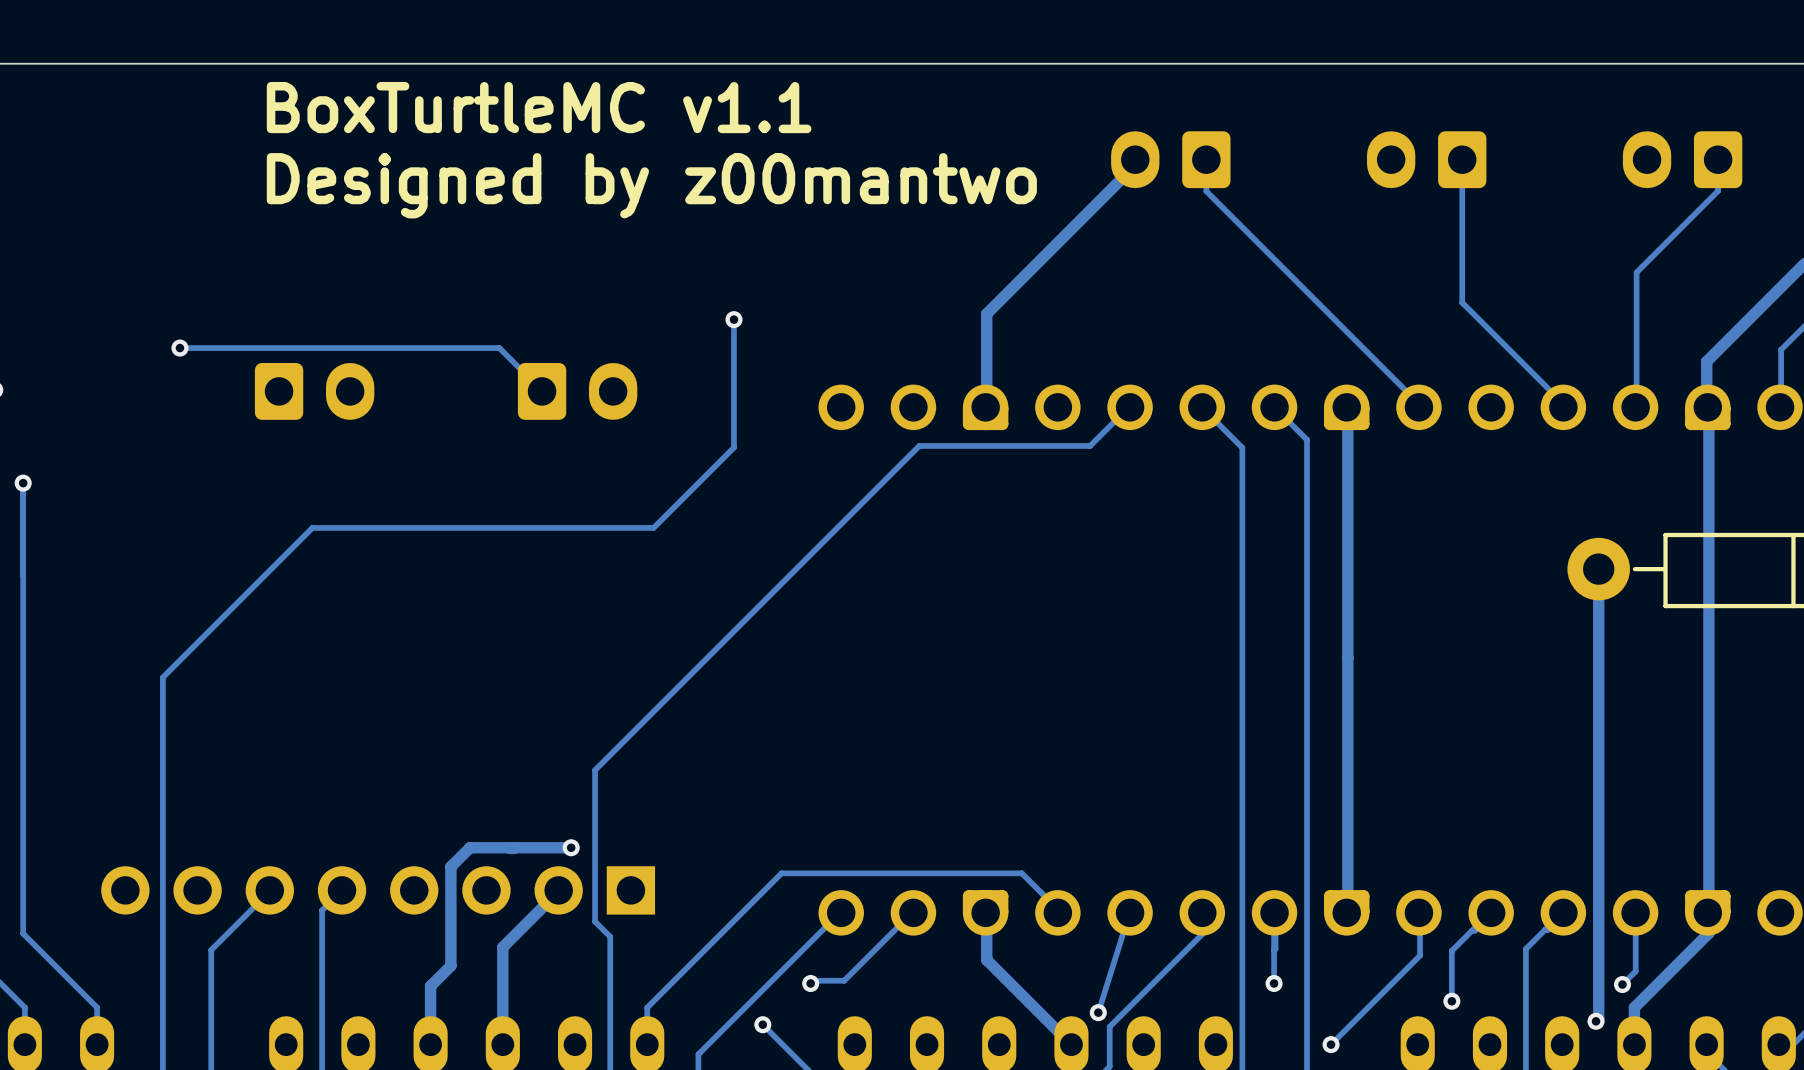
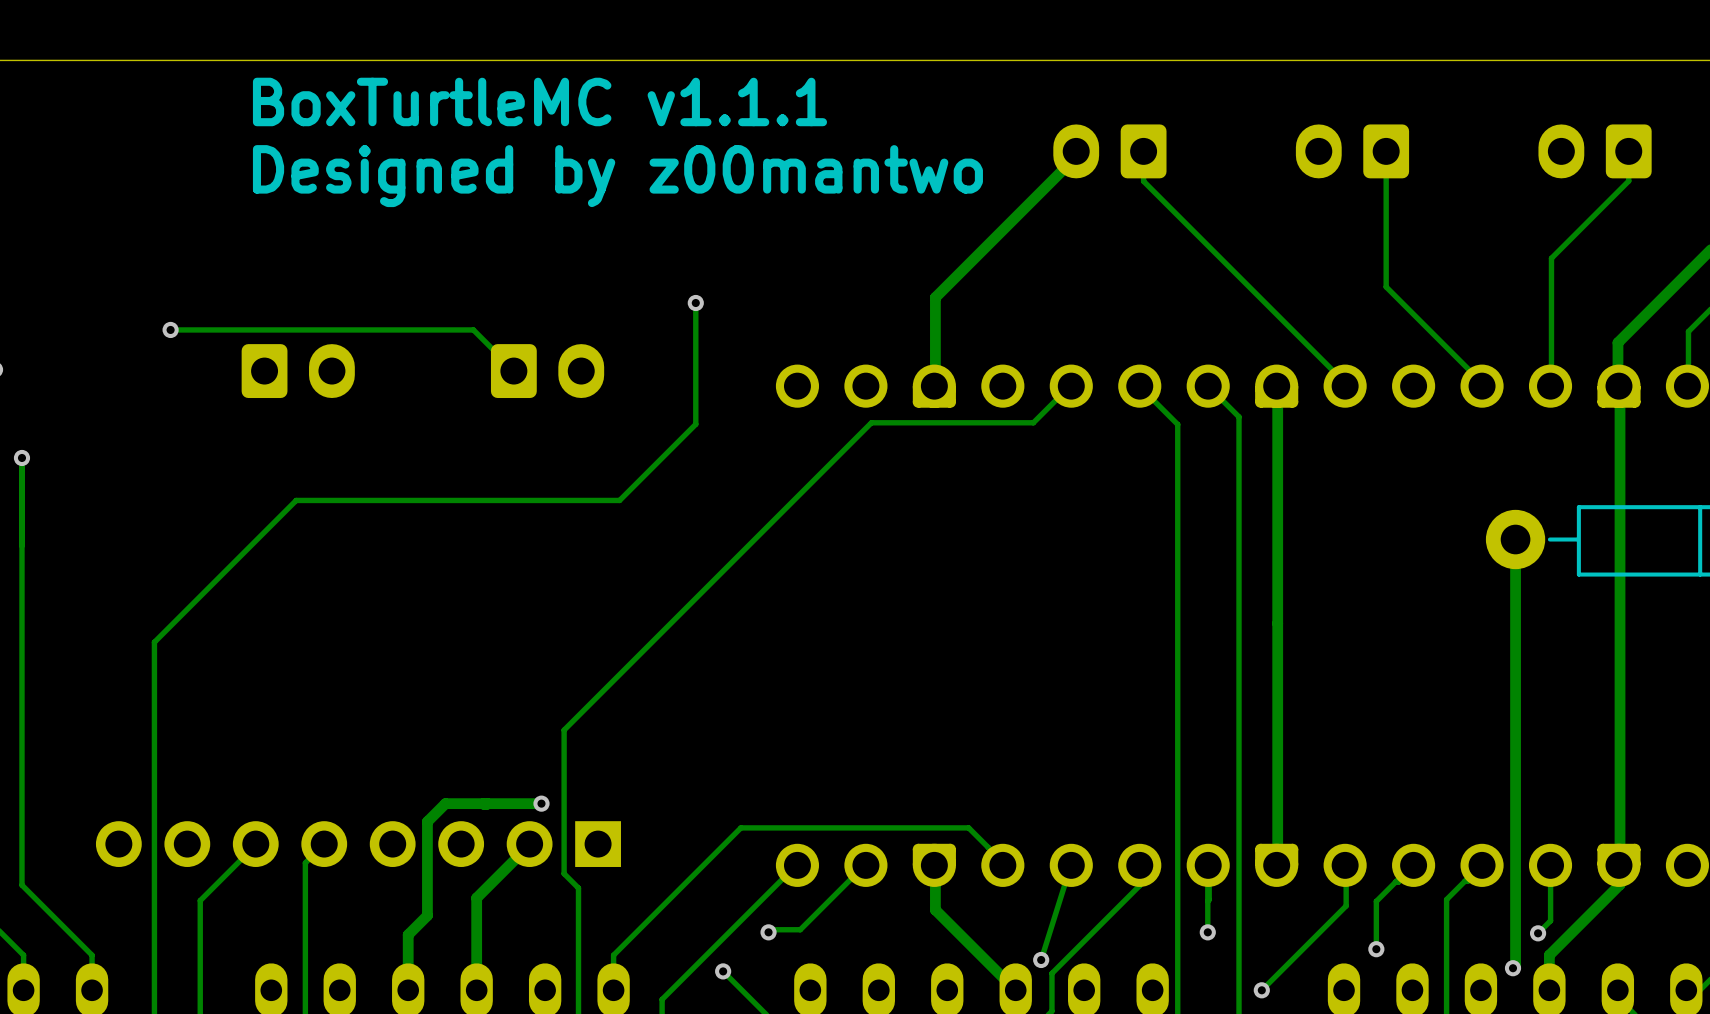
text: BoxTurtleMC v1.1 (539, 107) -> BoxTurtleMC v1.1.1 (539, 101)

